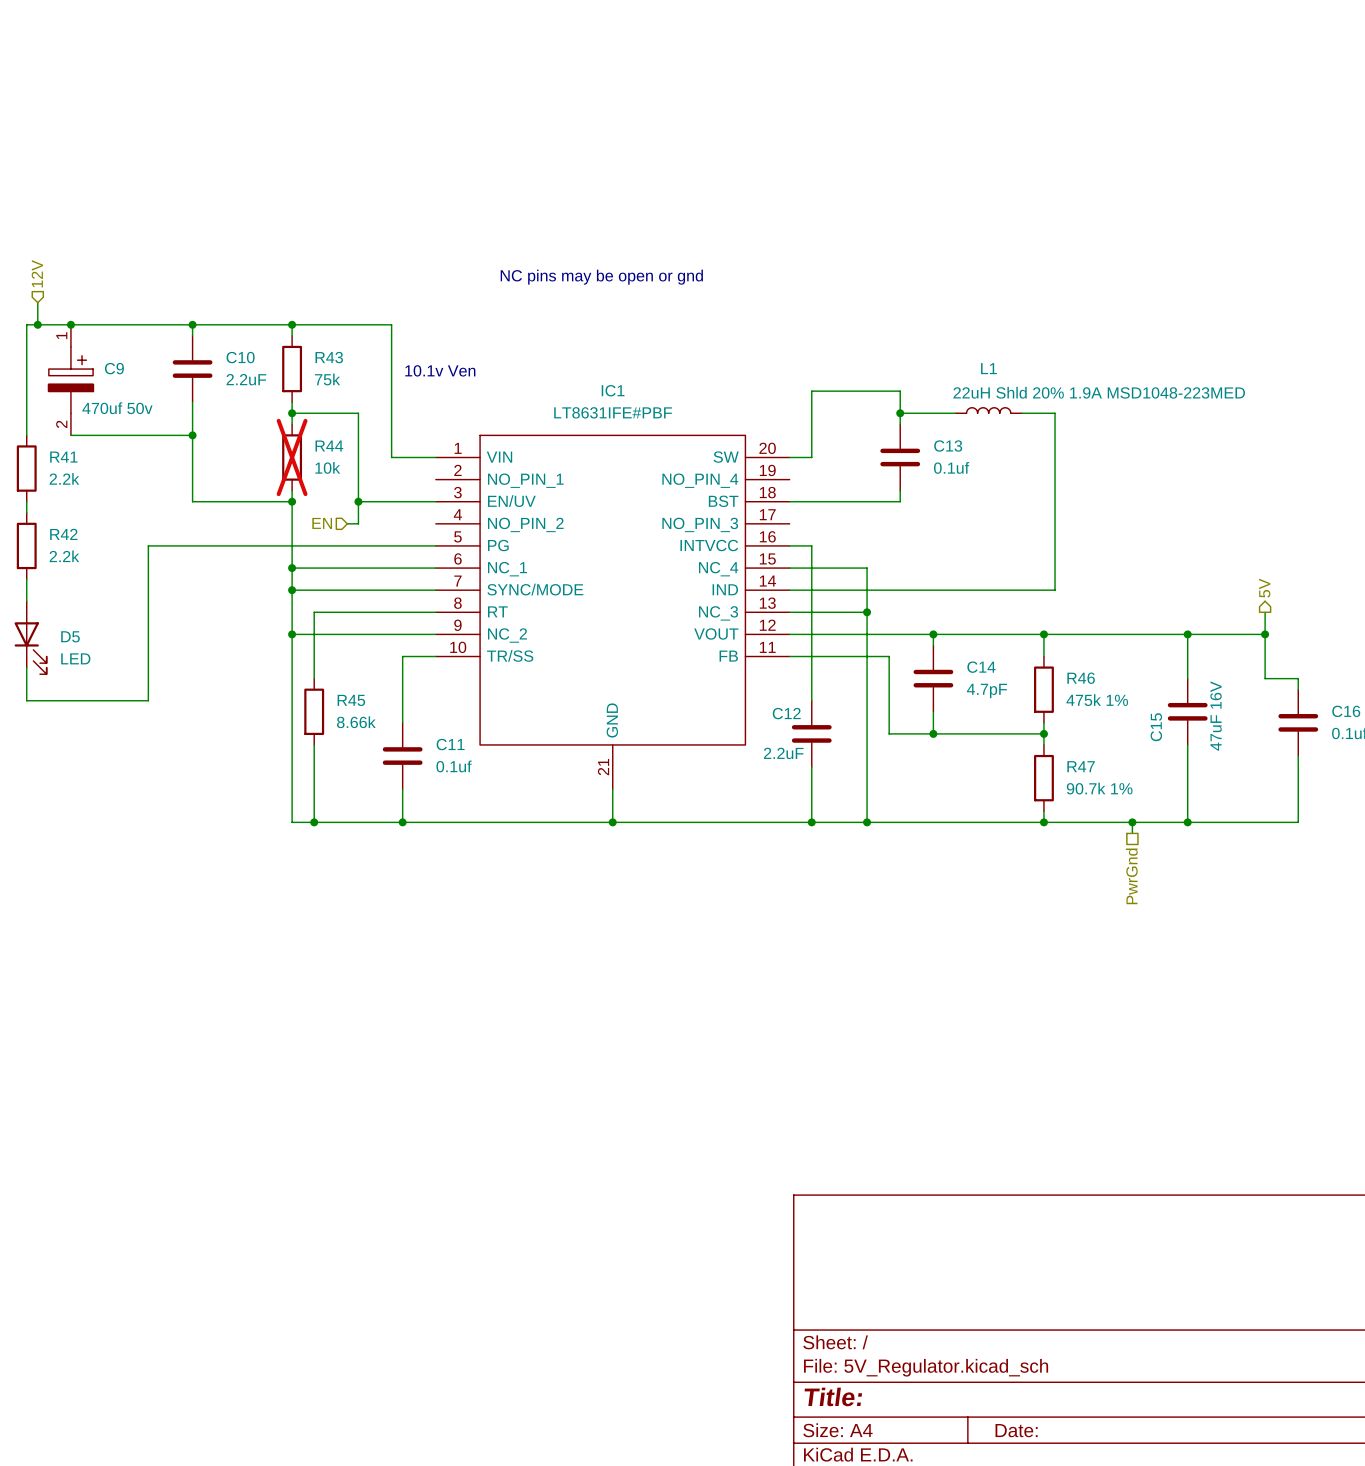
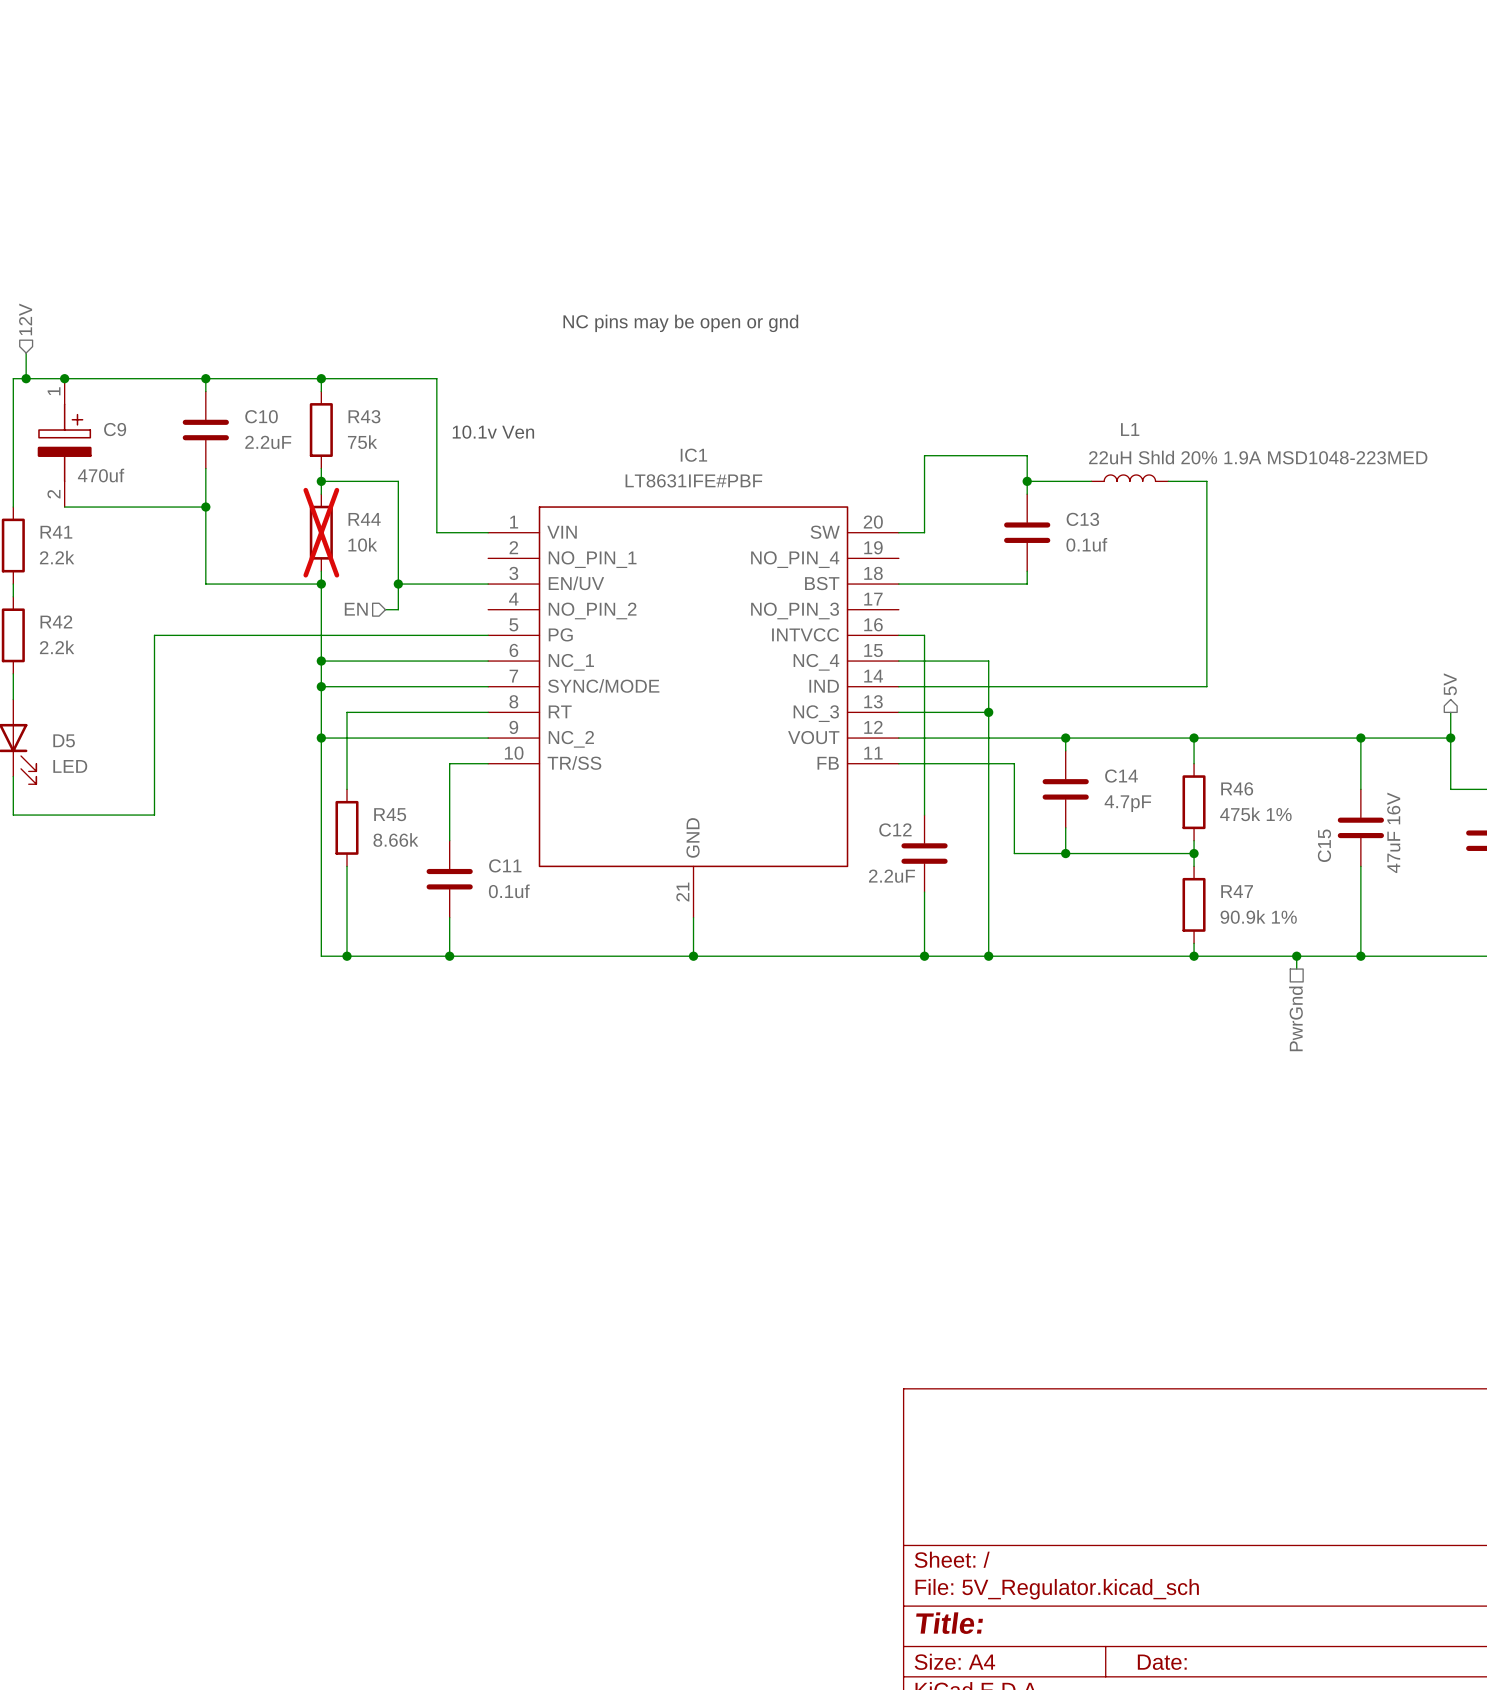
C9 value: 470uf 50v (117, 408) -> 470uf (101, 475)
R47 value: 90.7k 1% (1099, 788) -> 90.9k 1% (1258, 916)

